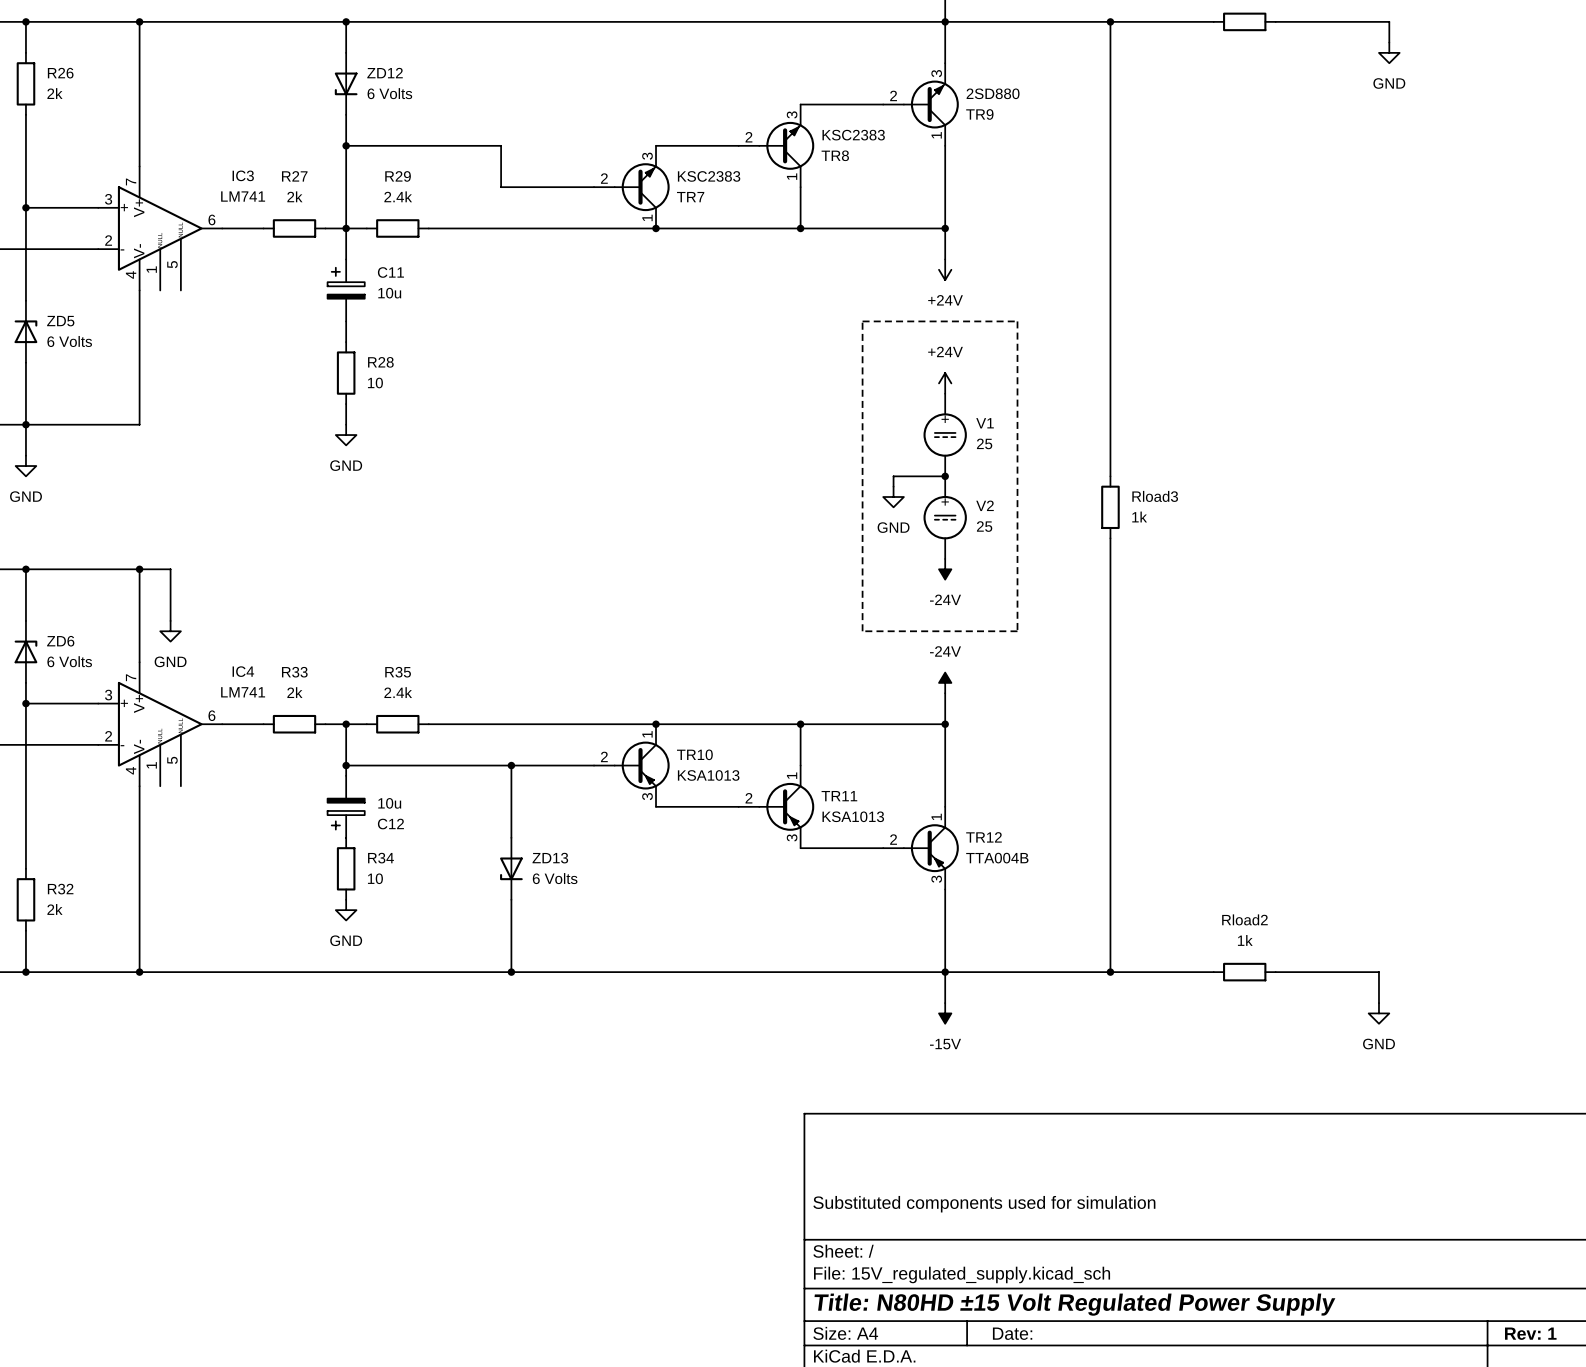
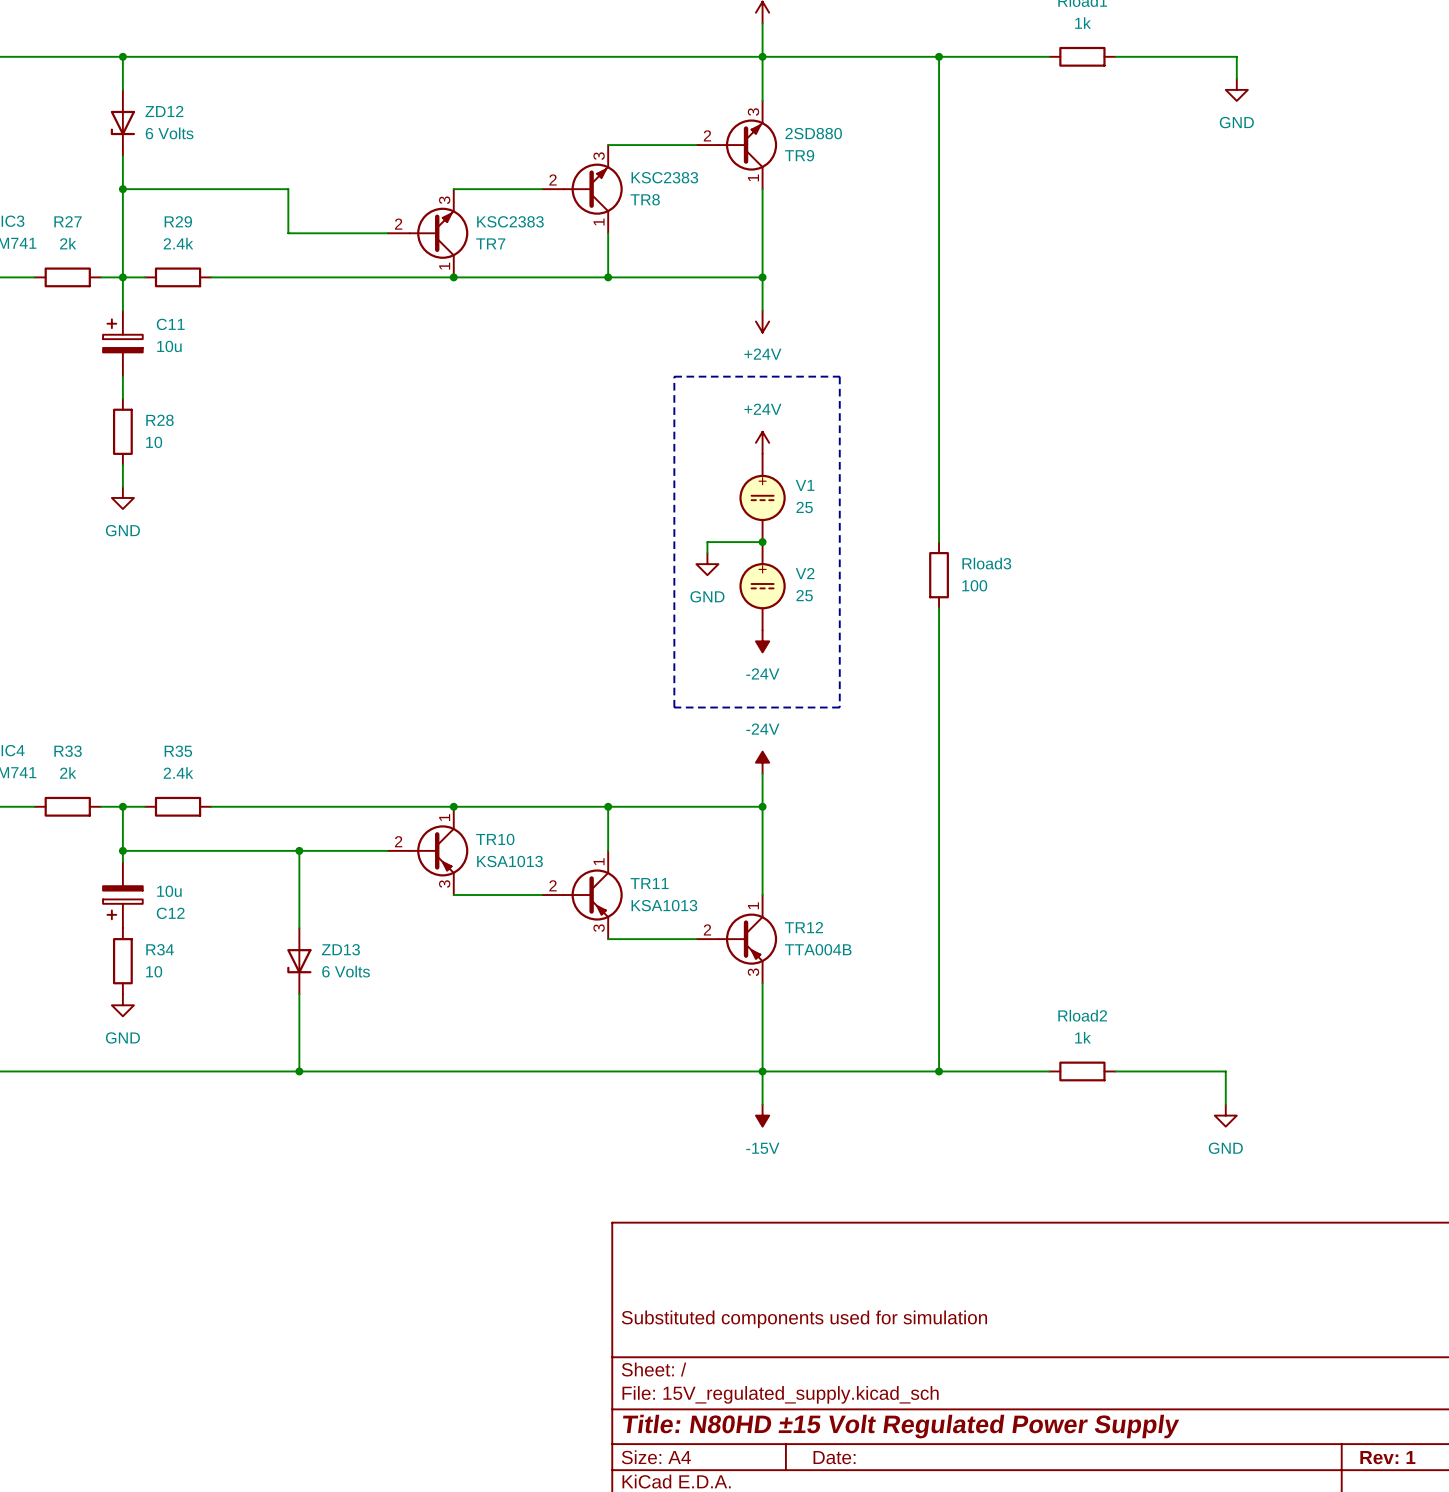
Rload3 value: 1k (1139, 517) -> 100 (974, 585)

